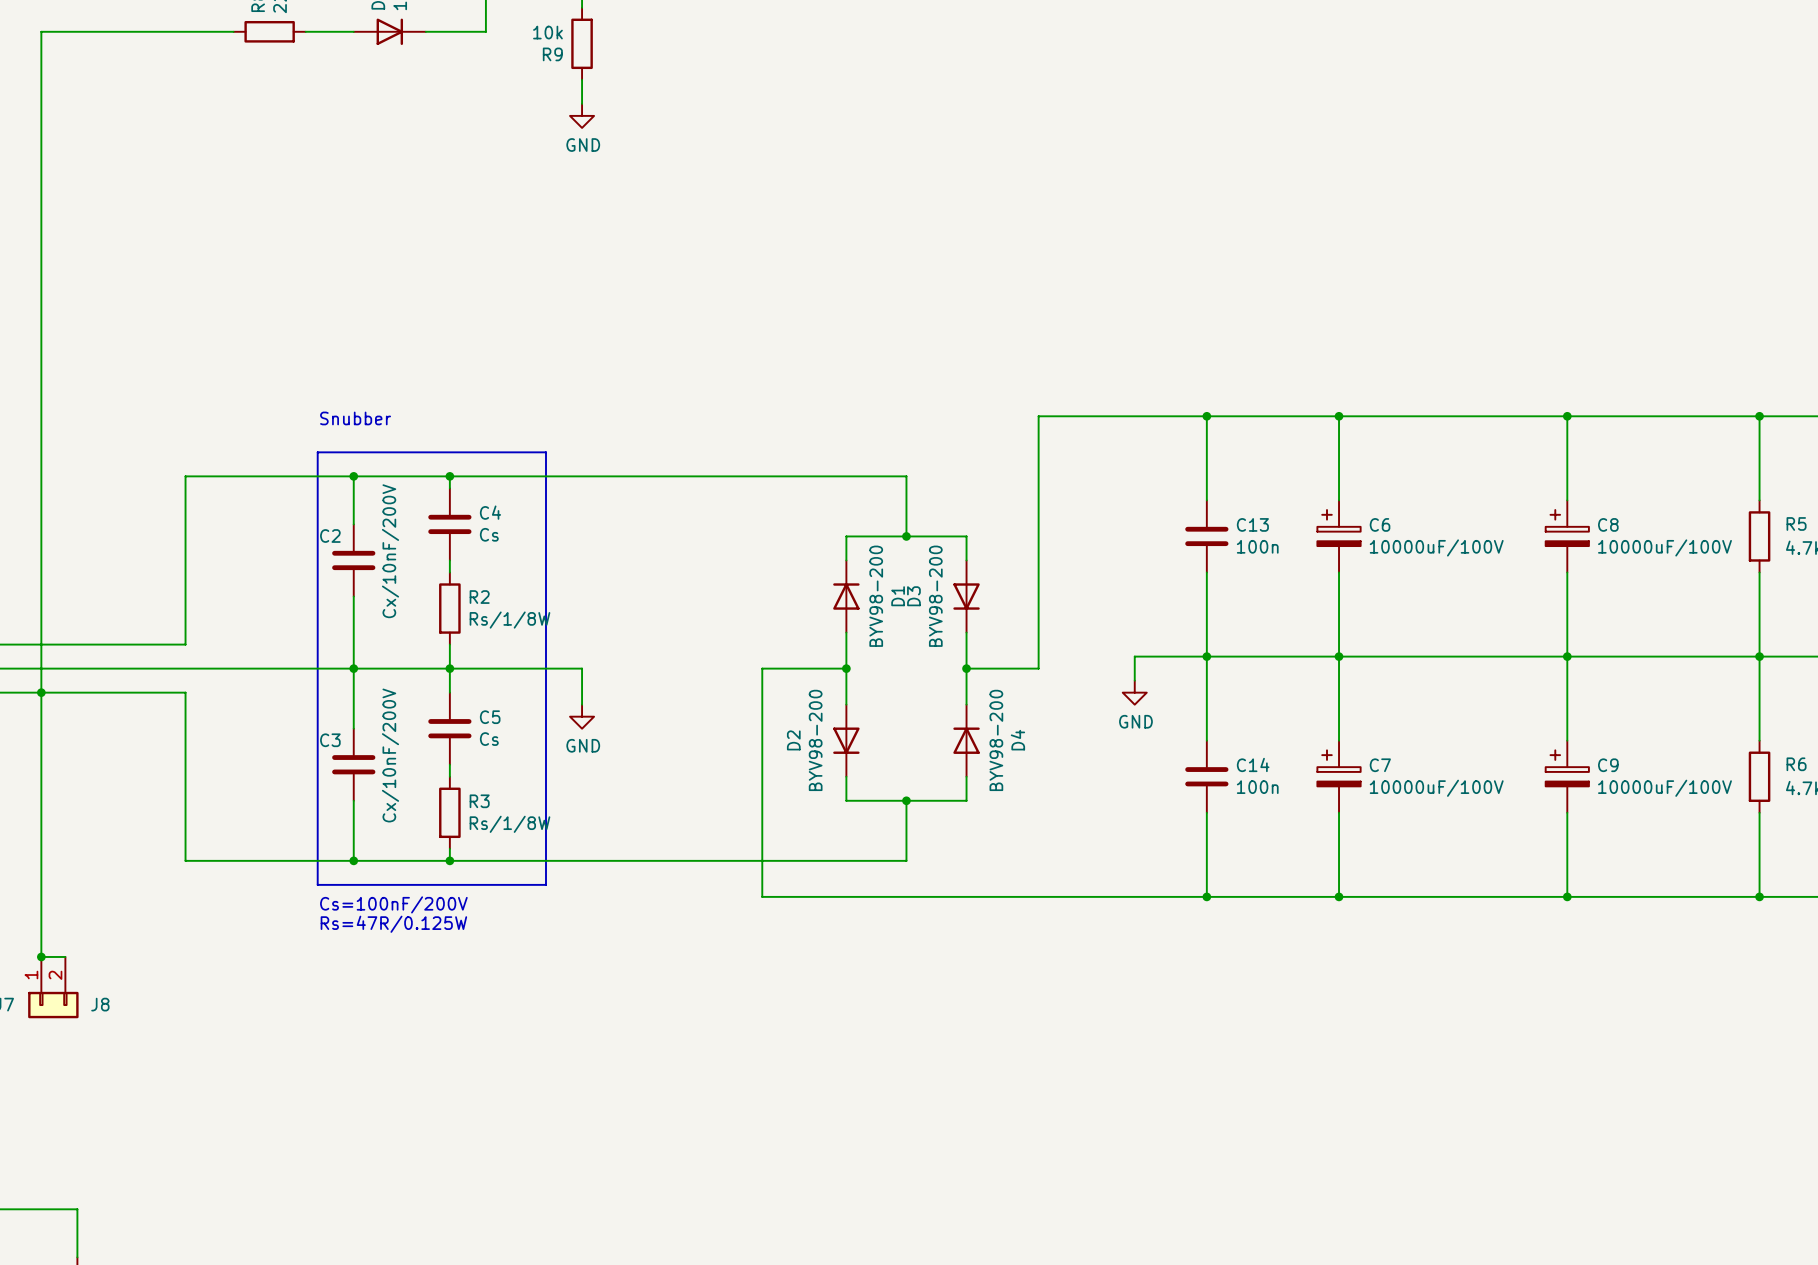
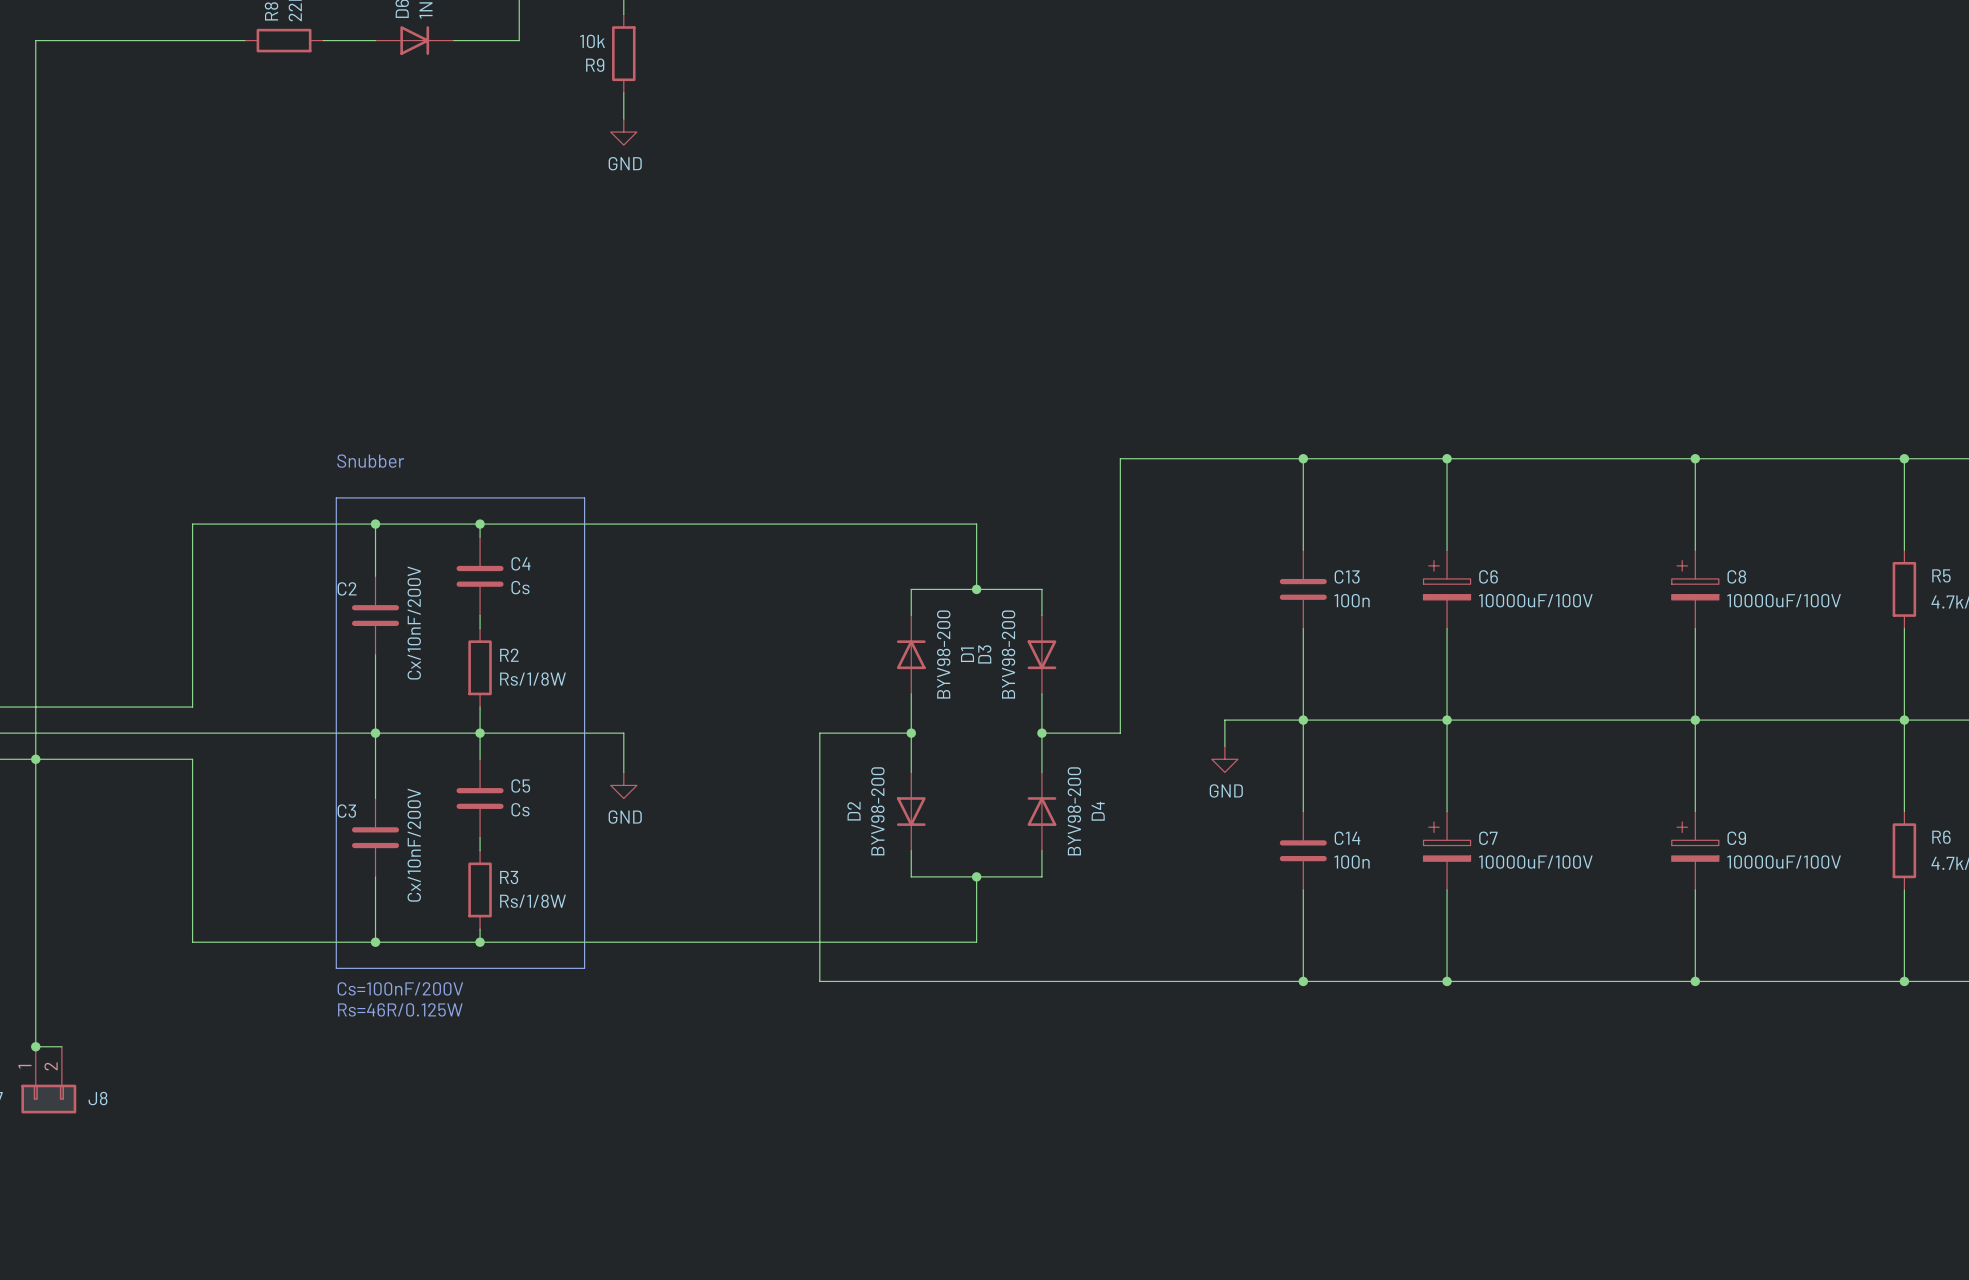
text: Rs=47R/0.125W (393, 924) -> Rs=46R/0.125W (400, 1009)

